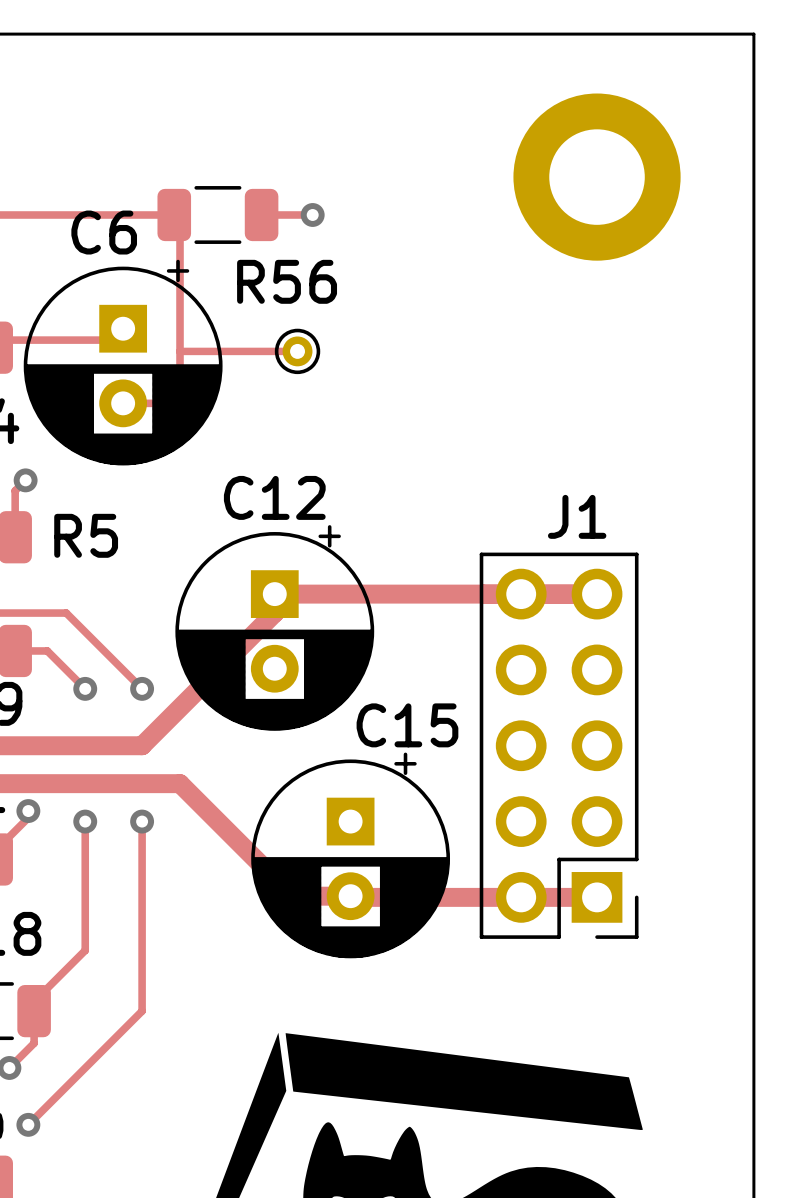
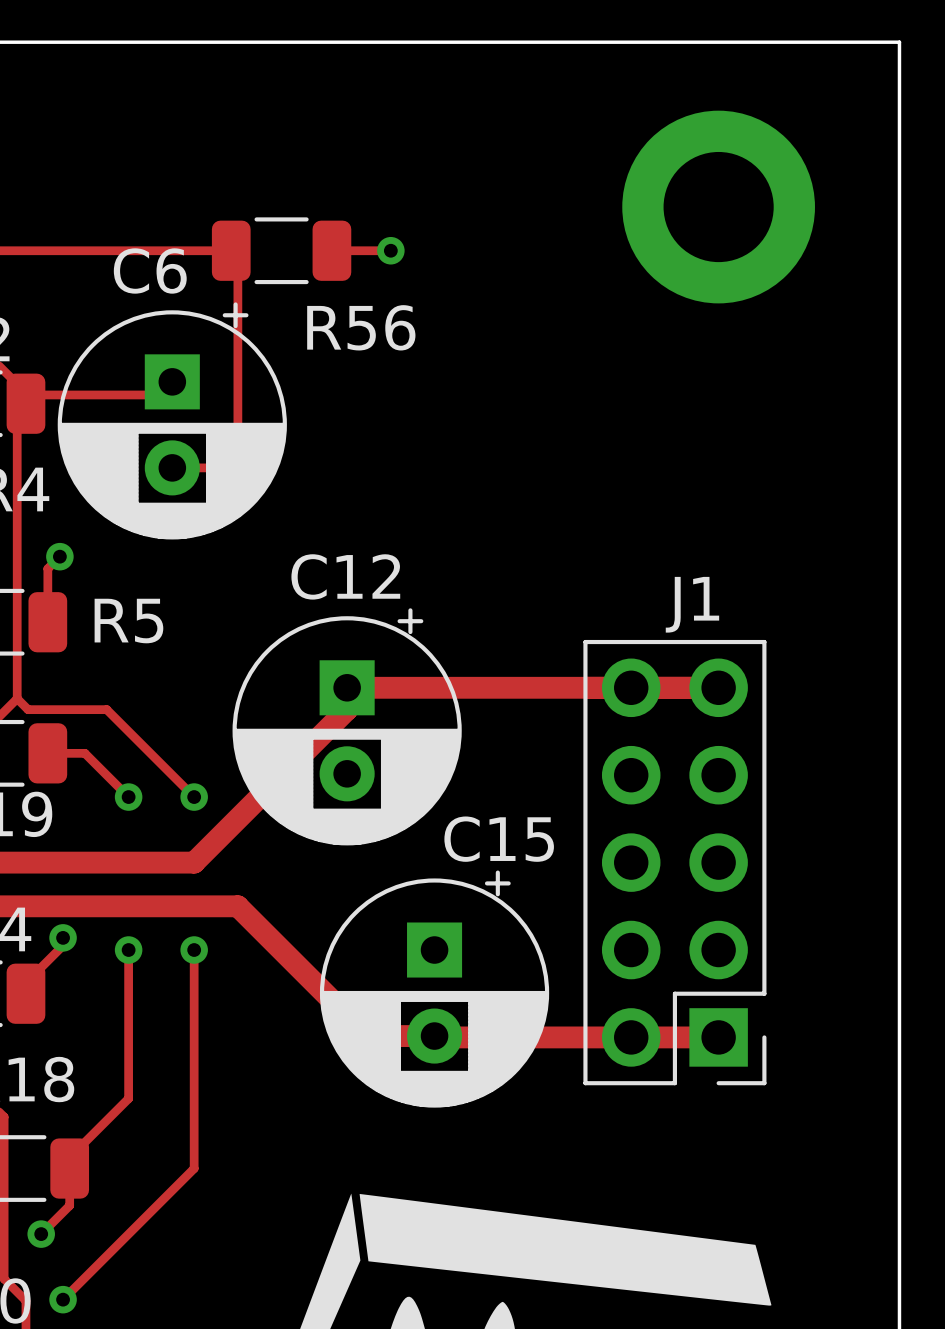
track: (180, 351) (297, 351) -> none
part: (297, 351) -> none

